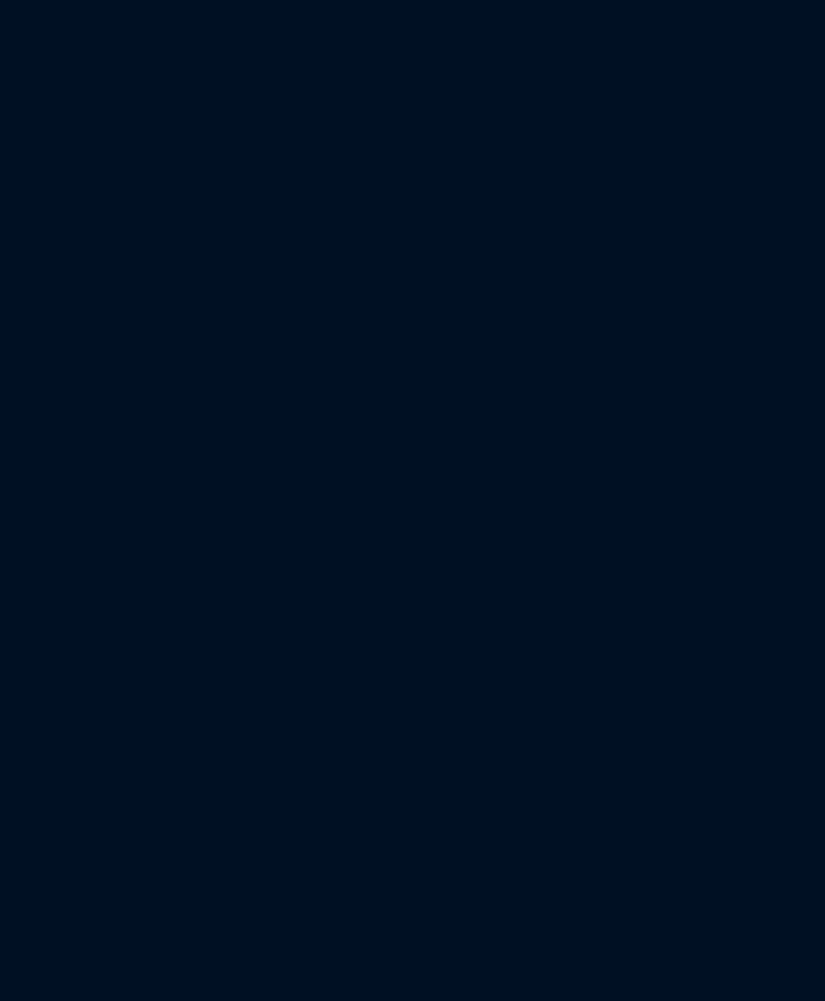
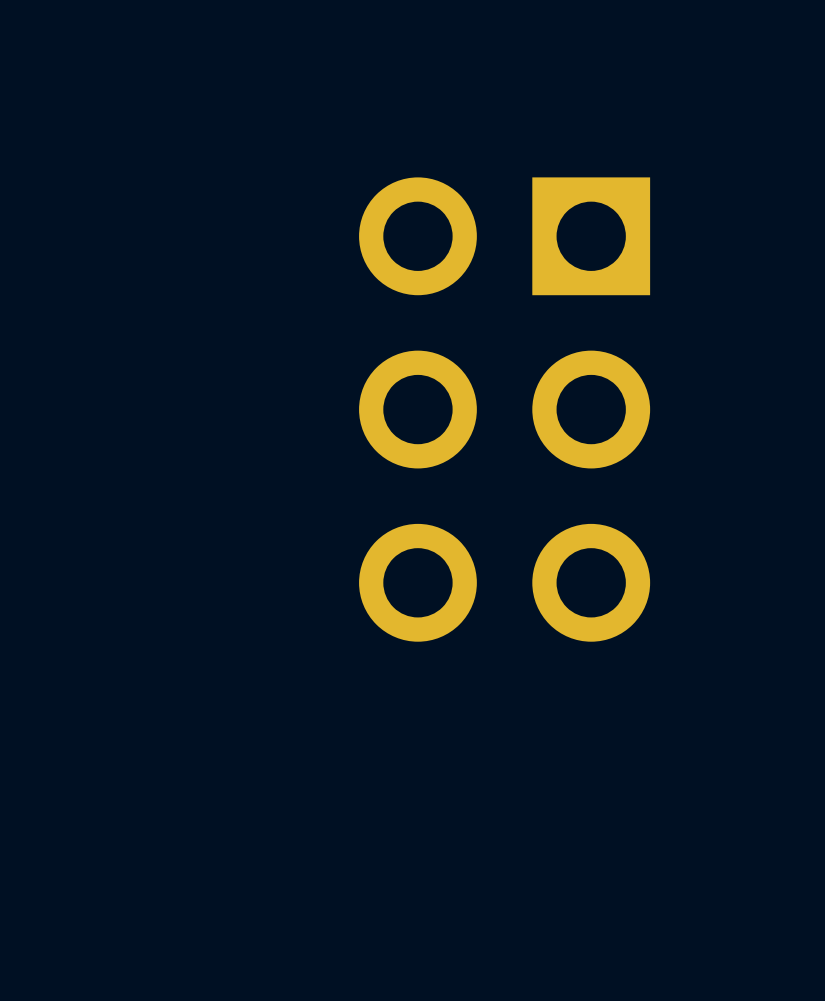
part: none -> (504, 409)

